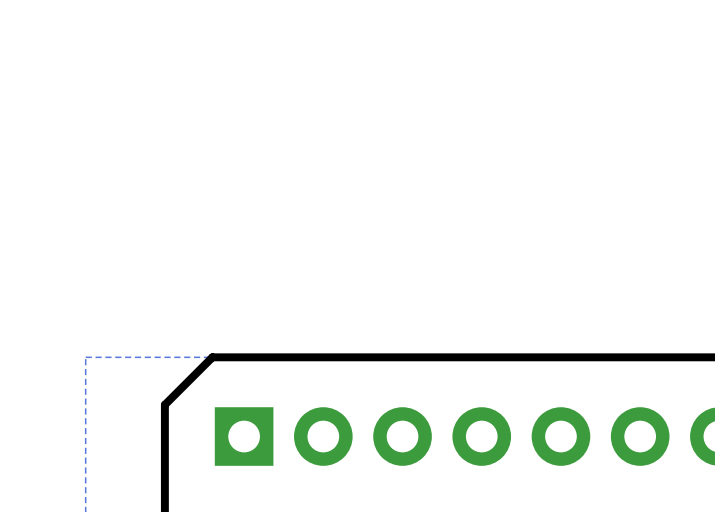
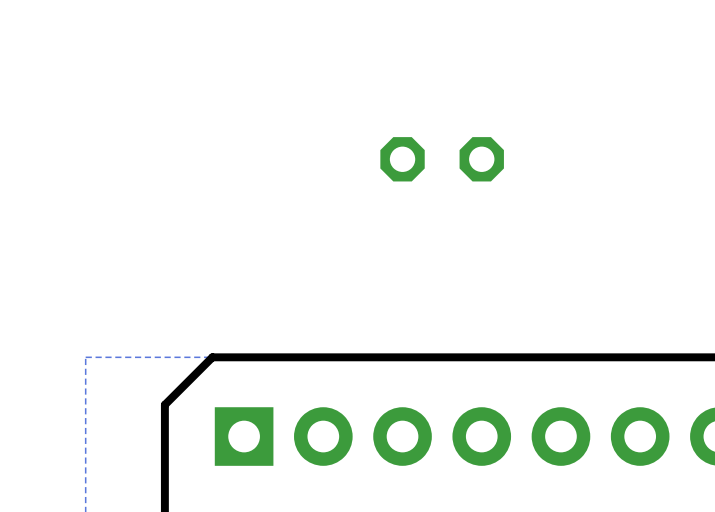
part: none -> (442, 159)

